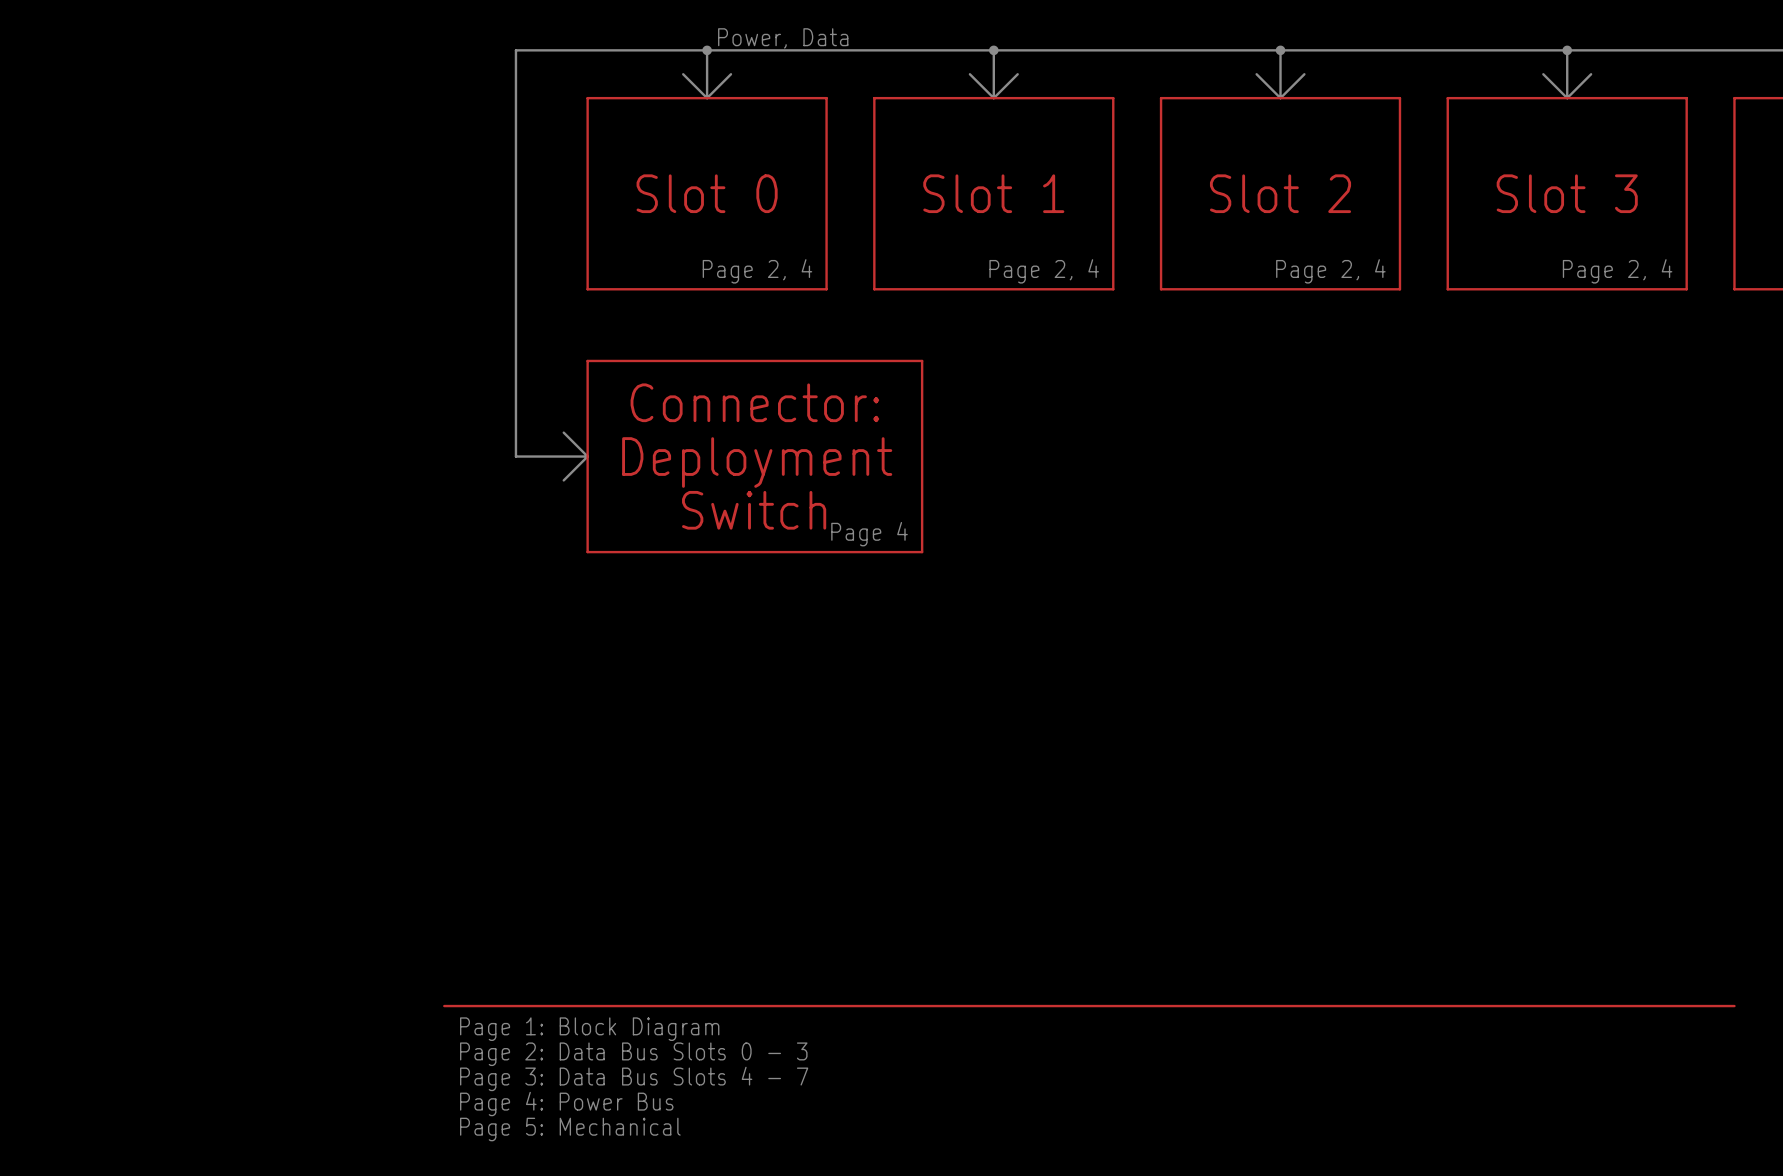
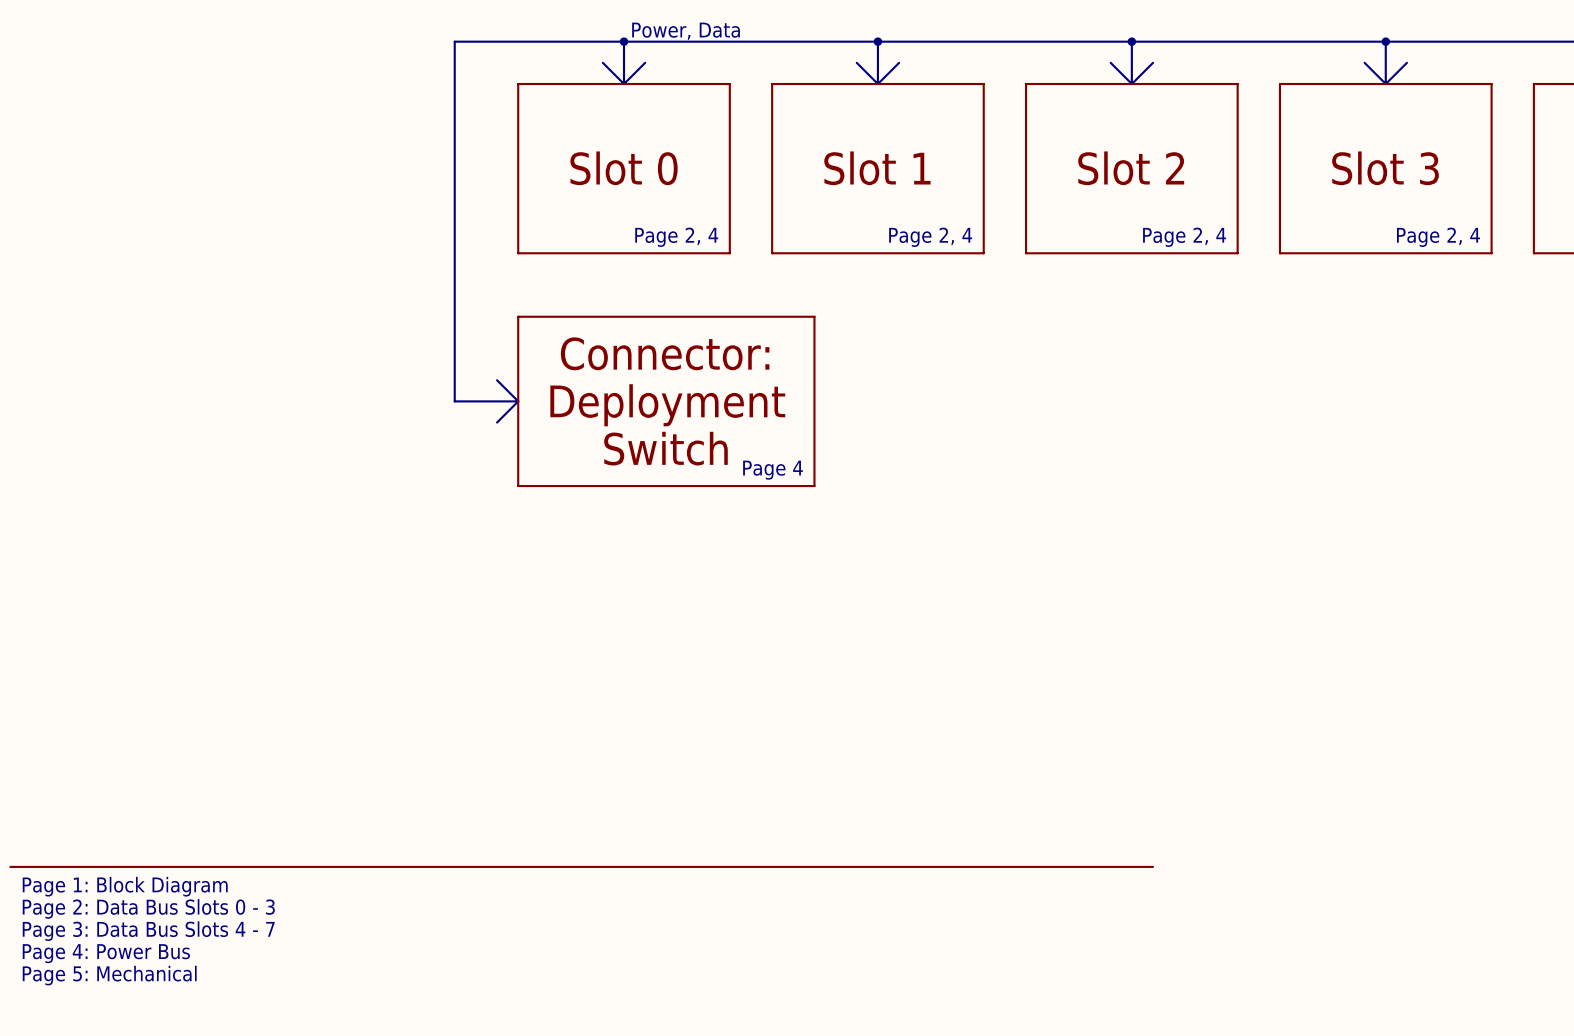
line: none -> (10, 866) (1153, 866)
text: none -> Page 1: Block Diagram (125, 886)
line: (444, 1006) (1734, 1006) -> none
text: Page 1: Block Diagram (589, 1029) -> none
text: none -> Page 2: Data Bus Slots 0 - 3 (148, 908)
text: Page 2: Data Bus Slots 0 - 3 (633, 1054) -> none
text: none -> Page 3: Data Bus Slots 4 - 7 (148, 931)
text: Page 3: Data Bus Slots 4 - 7 (634, 1078) -> none
text: none -> Page 4: Power Bus (106, 953)
text: Page 4: Power Bus (566, 1104) -> none
text: none -> Page 5: Mechanical (109, 975)
text: Page 5: Mechanical (570, 1129) -> none

